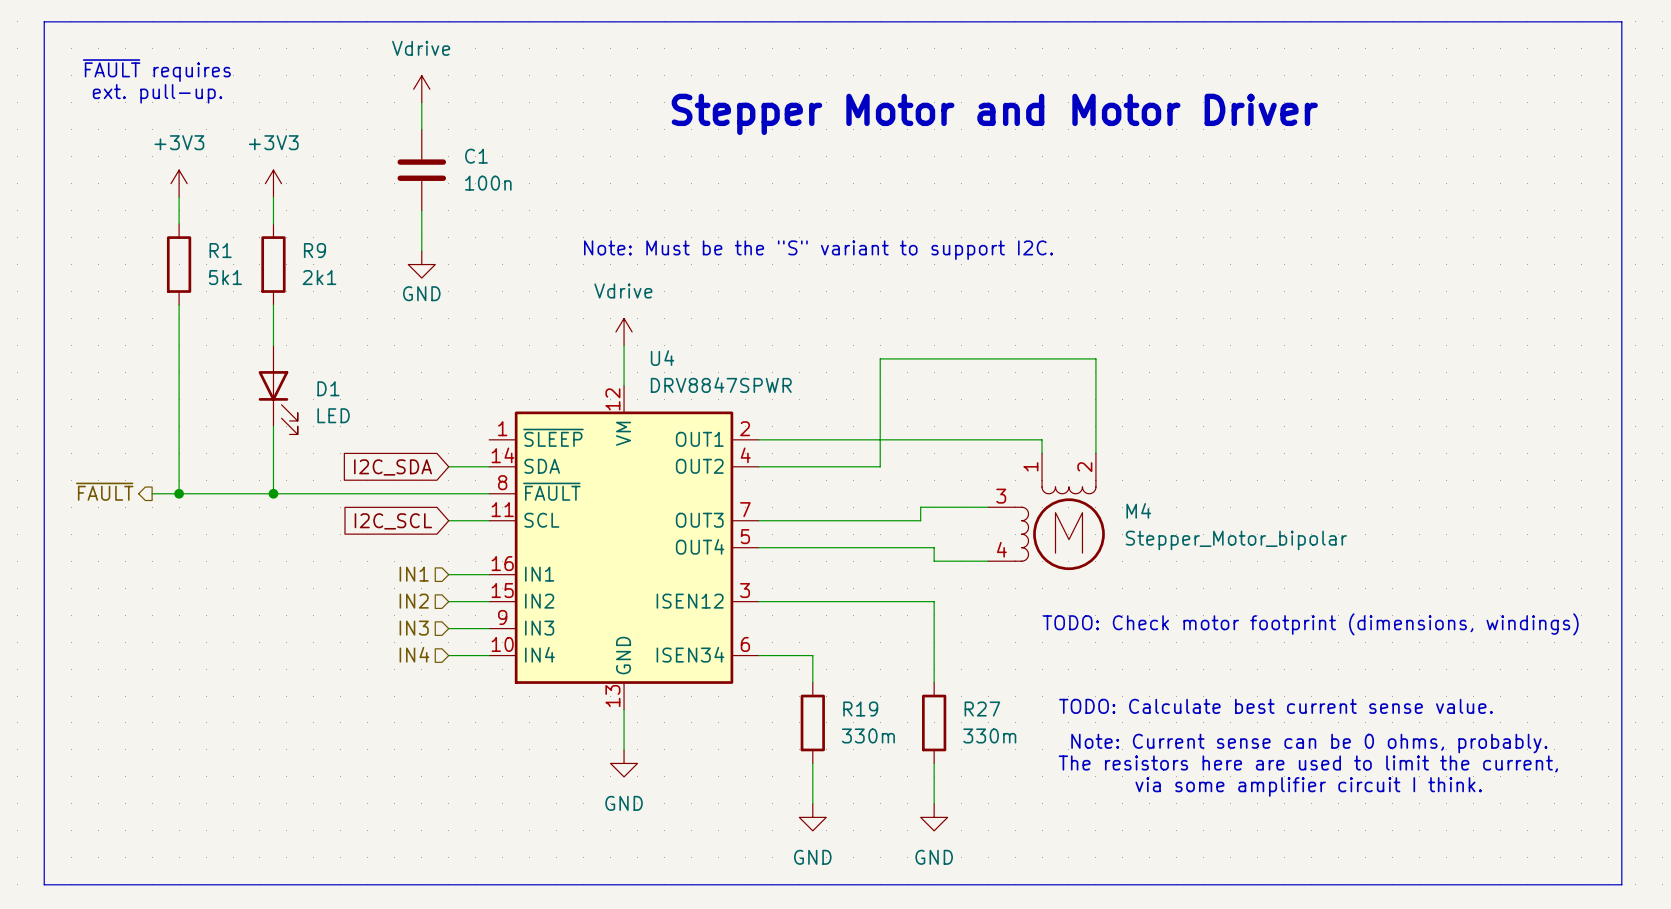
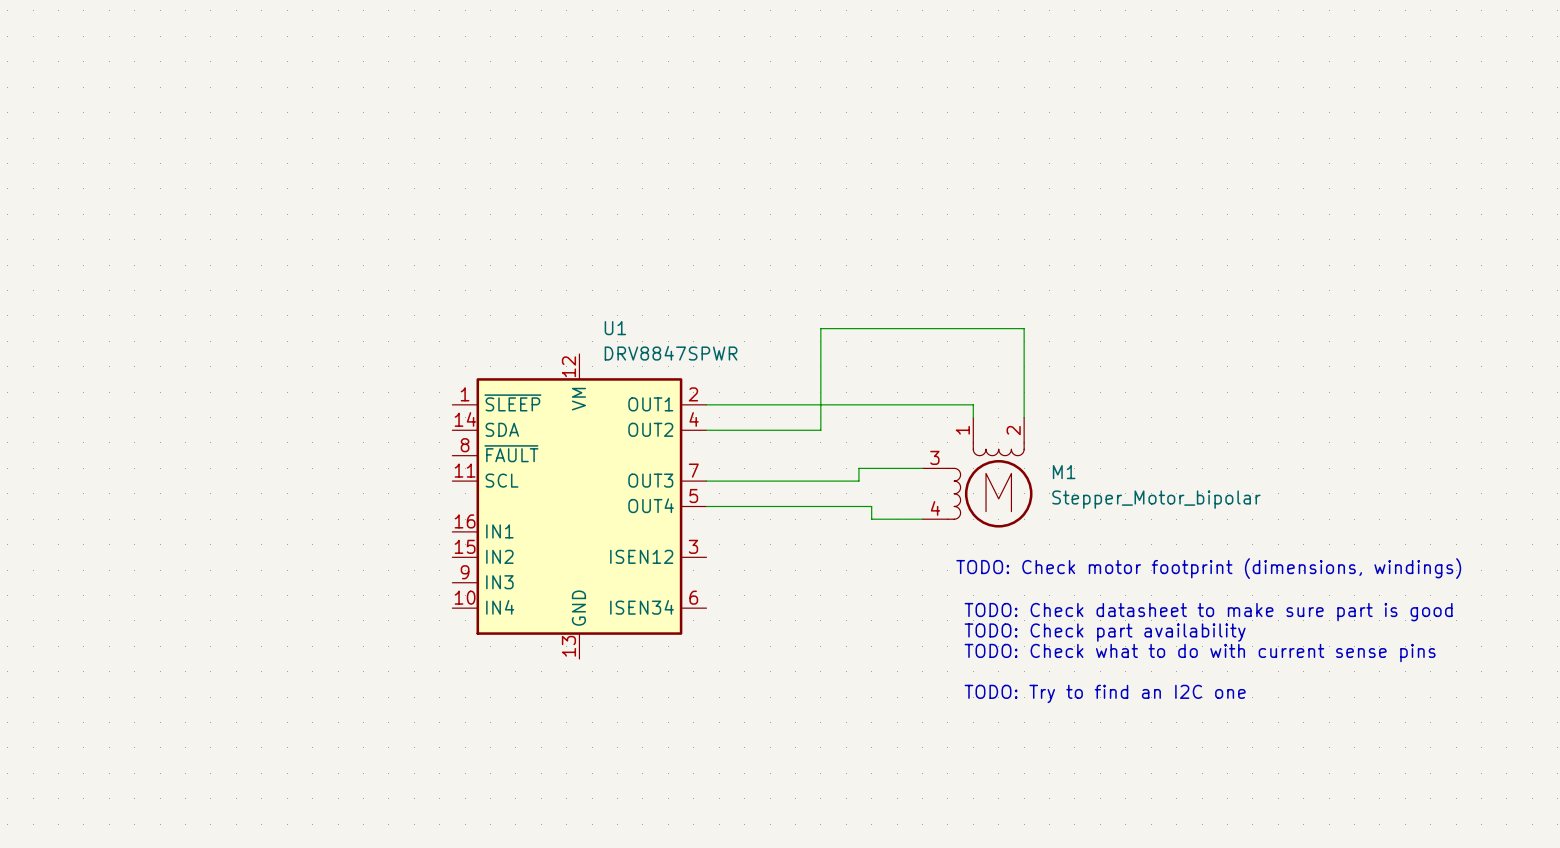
line: (44, 21) (1621, 21) (1621, 884) (44, 884) (44, 21) -> none
text: ~{FAULT} requires (156, 70) -> none
power symbol: Vdrive (421, 89) -> none
text: ext. pull-up. (157, 93) -> none
wire: (421, 102) (421, 129) -> none
text: Stepper Motor and Motor Driver (994, 114) -> none
C1: 100n (421, 170) -> none
power symbol: +3V3 (179, 183) -> none
power symbol: +3V3 (273, 183) -> none
wire: (179, 197) (179, 224) -> none
wire: (273, 197) (273, 224) -> none
wire: (421, 210) (421, 251) -> none
text: Note: Must be the "S" variant to support I2C. (818, 250) -> none
R1: 5k1 (179, 264) -> none
R9: 2k1 (273, 264) -> none
power symbol: GND (421, 264) -> none
wire: (179, 305) (179, 493) -> none
wire: (273, 305) (273, 345) -> none
power symbol: Vdrive (624, 331) -> none
wire: (624, 345) (624, 385) -> none
U4 name: U4 (662, 358) -> U1 (615, 328)
D1: LED (278, 389) -> none
wire: (273, 426) (273, 493) -> none
wire: (448, 466) (489, 466) -> none
global label: I2C_SDA (393, 467) -> none
hierarchical label: ~{FAULT} (104, 491) -> none
wire: (152, 493) (489, 493) -> none
junction: (179, 493) -> none
junction: (273, 493) -> none
M4 name: M4 (1138, 510) -> M1 (1064, 472)
wire: (448, 520) (489, 520) -> none
global label: I2C_SCL (393, 521) -> none
hierarchical label: IN1 (414, 574) -> none
wire: (448, 574) (489, 574) -> none
hierarchical label: IN2 (414, 601) -> none
wire: (448, 601) (489, 601) -> none
wire: (758, 601) (934, 601) (934, 682) -> none
text position: TODO: Check motor footprint (dimensions, windings) (1310, 624) -> TODO: Check motor footprint (dimensions, windings) (1208, 568)
hierarchical label: IN3 (414, 628) -> none
wire: (448, 628) (489, 628) -> none
hierarchical label: IN4 (414, 654) -> none
wire: (448, 655) (489, 655) -> none
wire: (758, 655) (812, 655) (812, 682) -> none
text: none -> TODO: Check datasheet to make sure part is good (1208, 612)
text: none -> TODO: Check part availability (1105, 632)
text: TODO: Calculate best current sense value. (1275, 706) -> TODO: Check what to do with current sense pins (1200, 653)
wire: (624, 709) (624, 749) -> none
R19: 330m (812, 722) -> none
R27: 330m (934, 722) -> none
text: Note: Current sense can be 0 ohms, probably. (1309, 743) -> none
text: none -> TODO: Try to find an I2C one (1105, 693)
power symbol: GND (624, 763) -> none
wire: (812, 763) (812, 803) -> none
wire: (934, 763) (934, 803) -> none
text: The resistors here are used to limit the current, (1308, 763) -> none
text: via some amplifier circuit I think. (1308, 786) -> none
power symbol: GND (812, 817) -> none
power symbol: GND (934, 817) -> none

